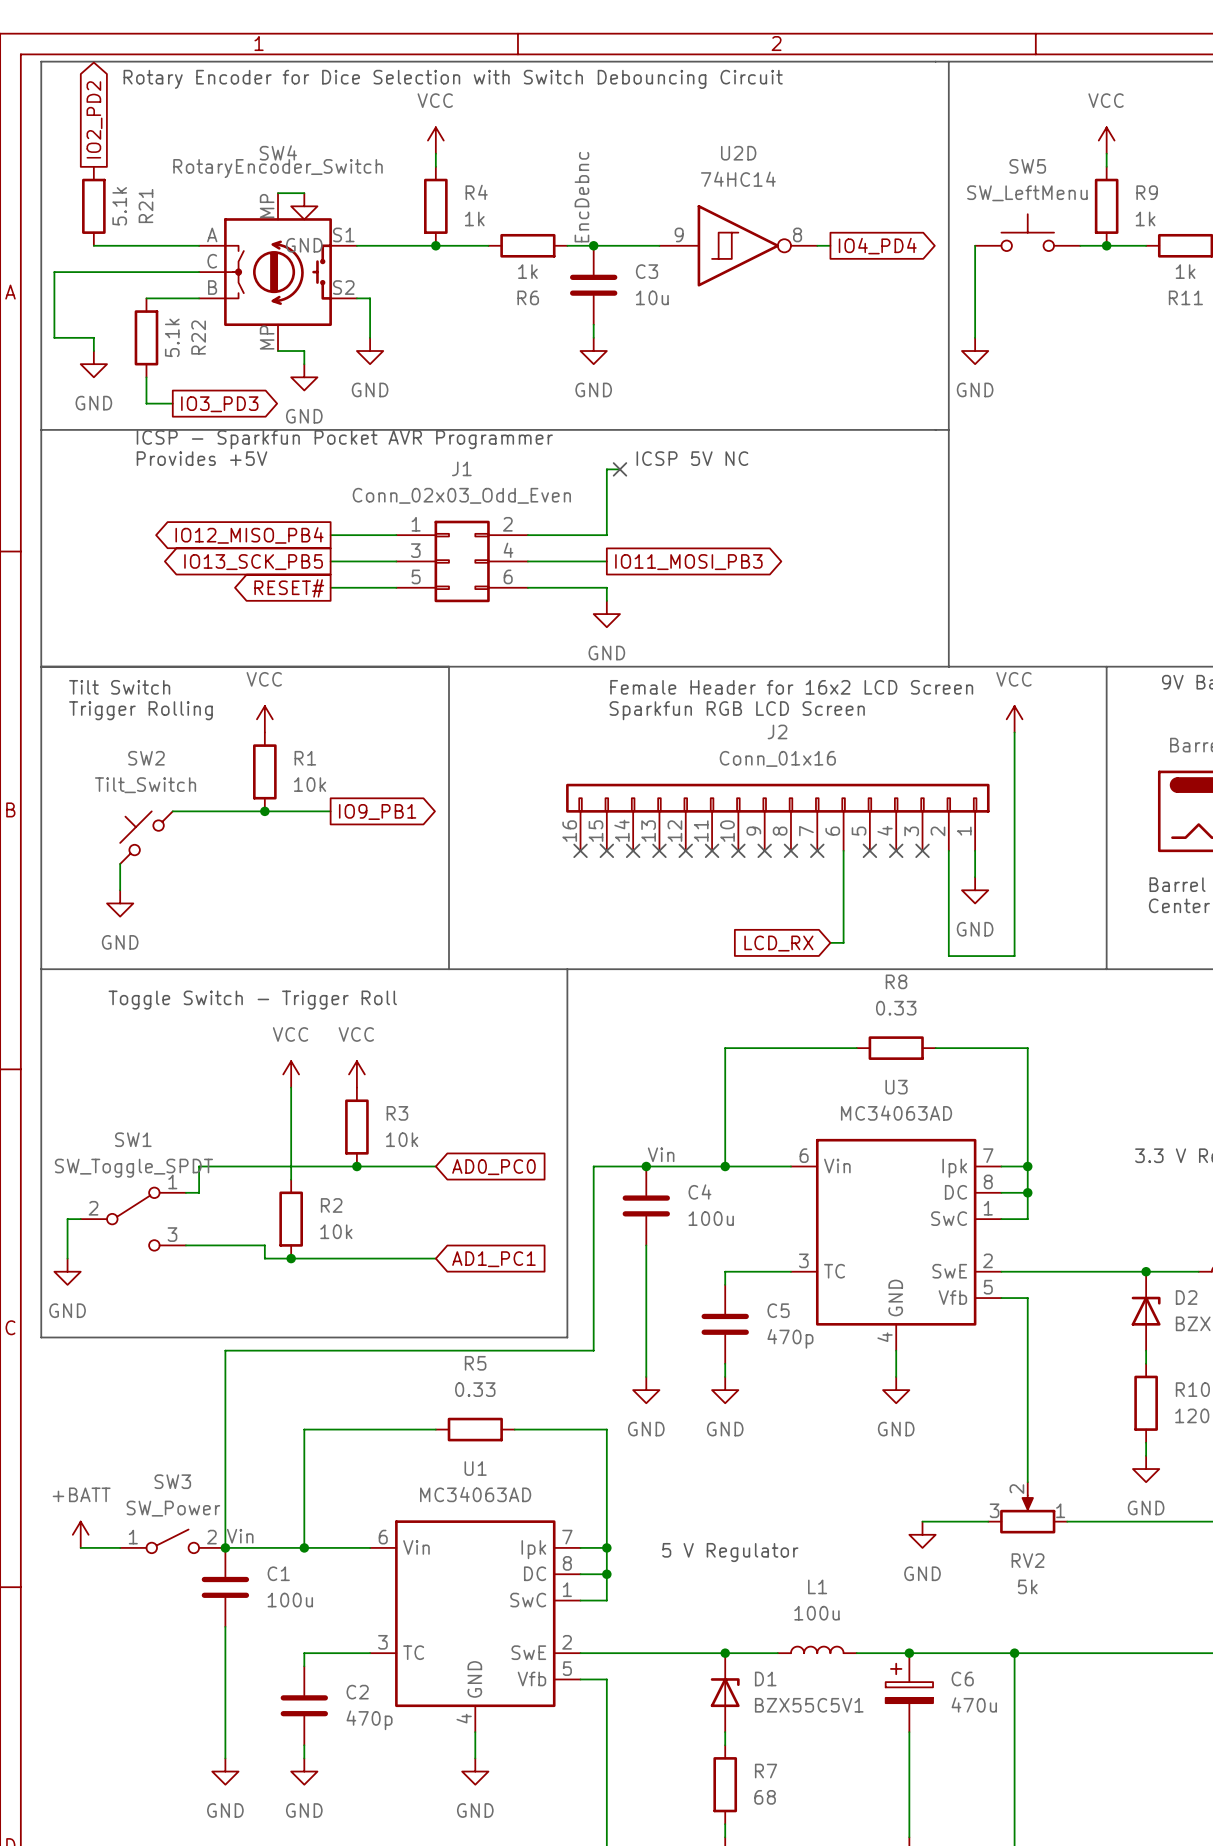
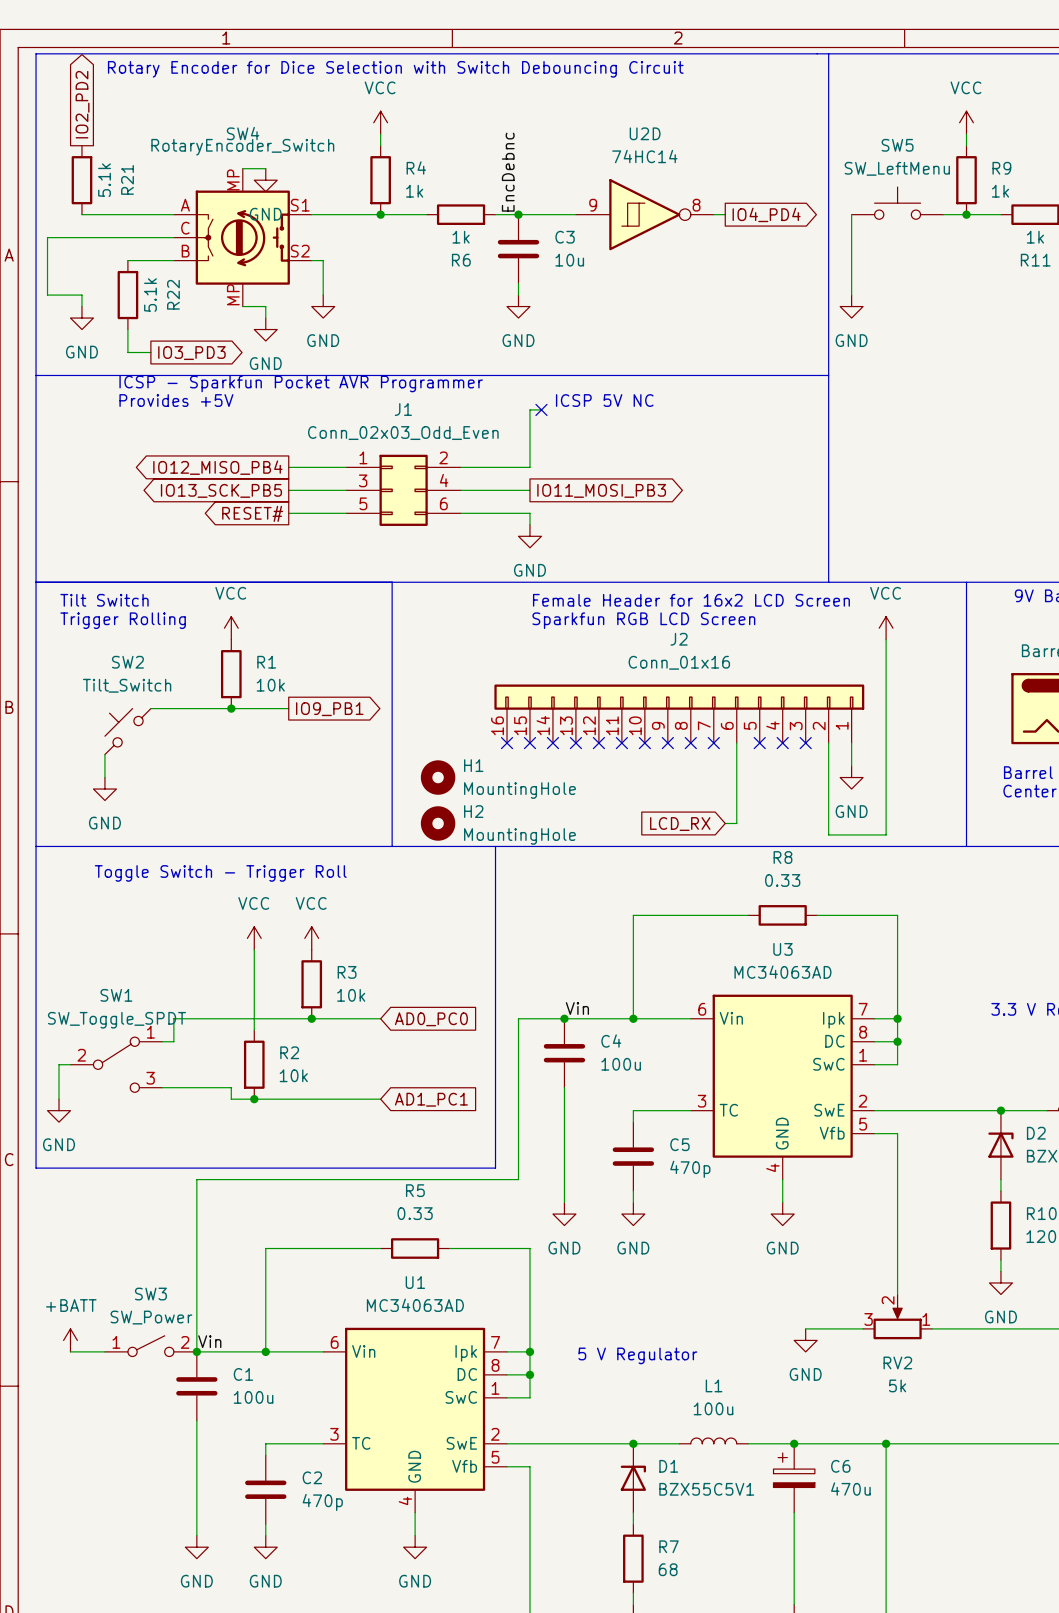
H1: none -> MountingHole (438, 777)
H2: none -> MountingHole (438, 823)

